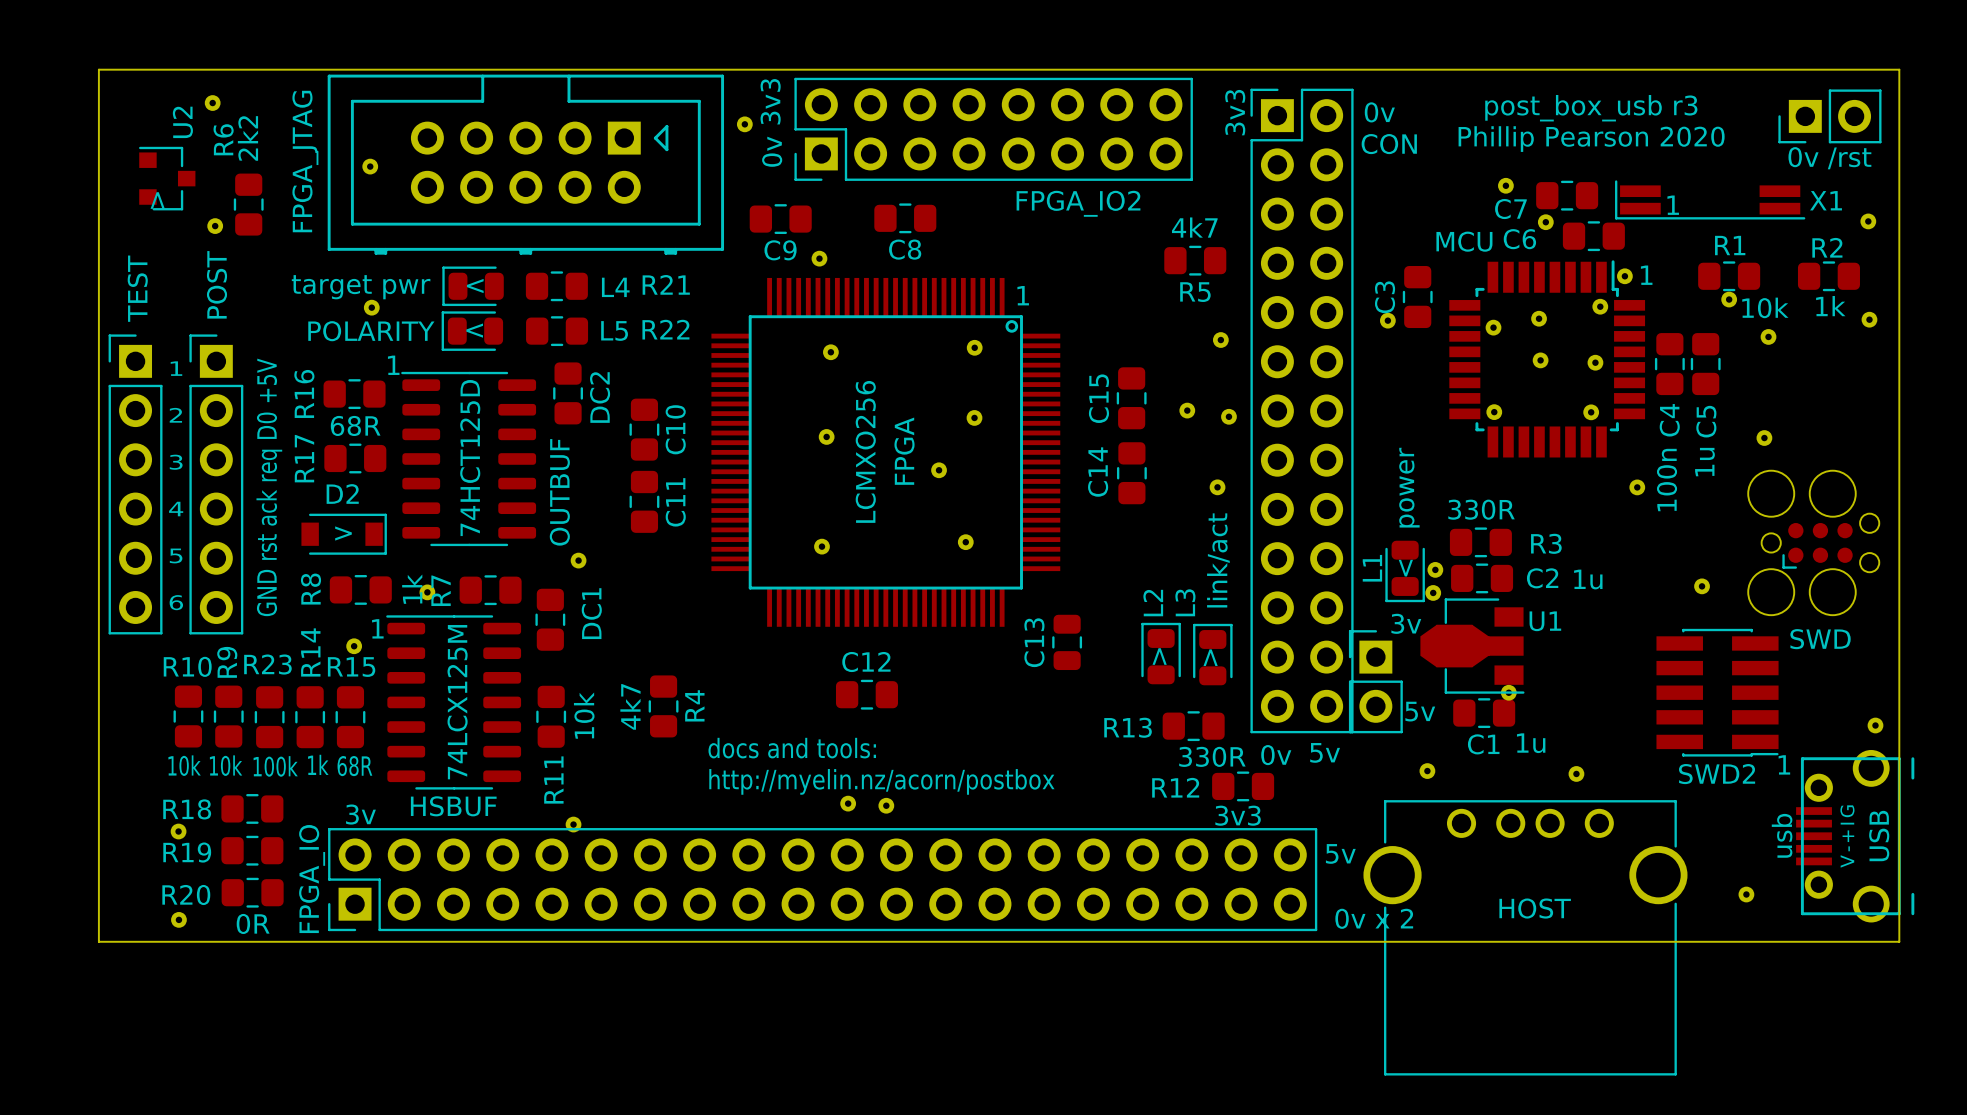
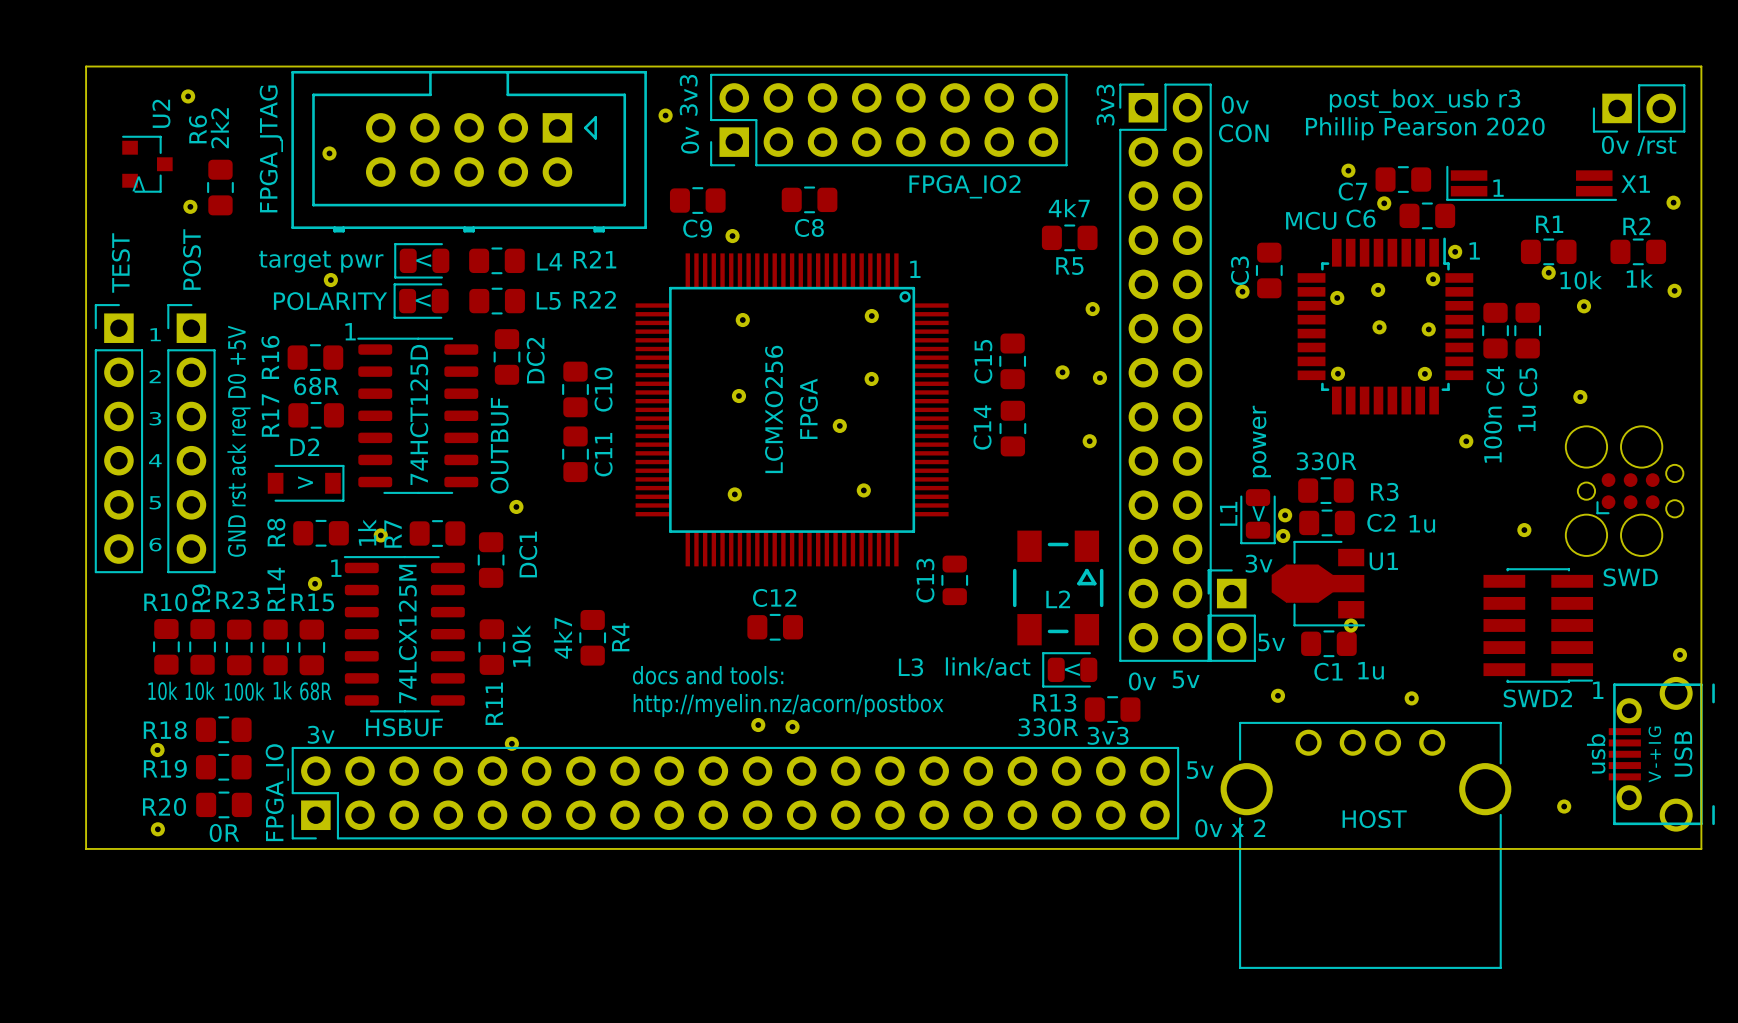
L3 name position: L3 (1185, 602) -> L3 (910, 667)
L2 name position: L2 (1153, 603) -> L2 (1058, 599)
L2 footprint: [1141, 622, 1181, 685] -> [1012, 530, 1104, 646]
L3 rotation: 0° (1212, 654) -> 90° counterclockwise (1069, 669)
L3 position: (1212, 654) -> (1069, 669)
text: > (1159, 656) -> none
text: > (1210, 657) -> none
R13: 330R (1193, 726) -> none
text: none -> > (1072, 669)
R12 name: R12 (1175, 787) -> R13 (1054, 702)
R12 value: none -> 330R (1048, 727)

